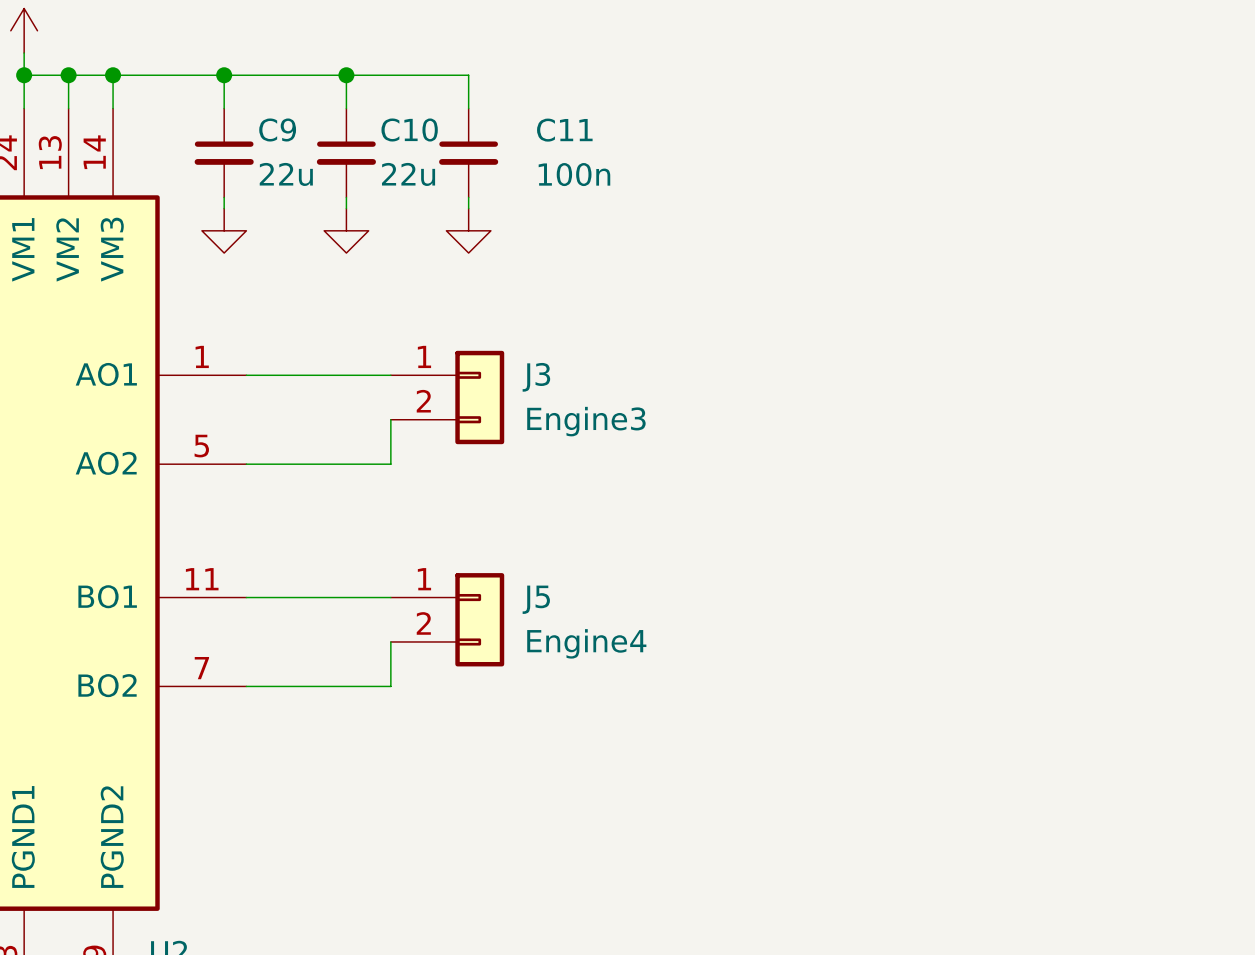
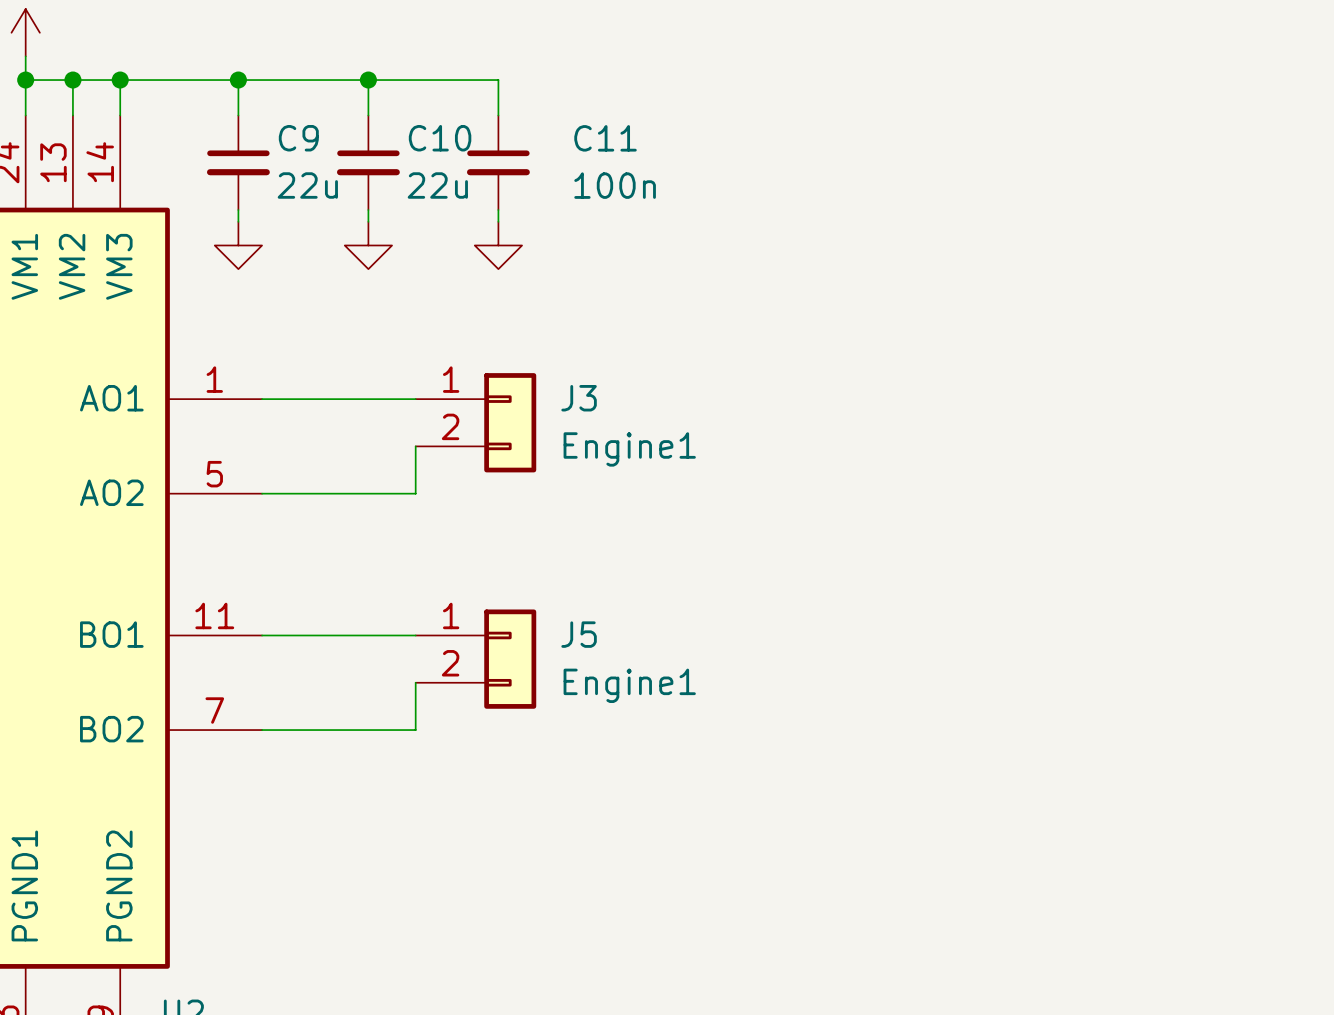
J3 value: Engine3 (586, 421) -> Engine1 (629, 449)
J5 value: Engine4 (586, 643) -> Engine1 (629, 685)

